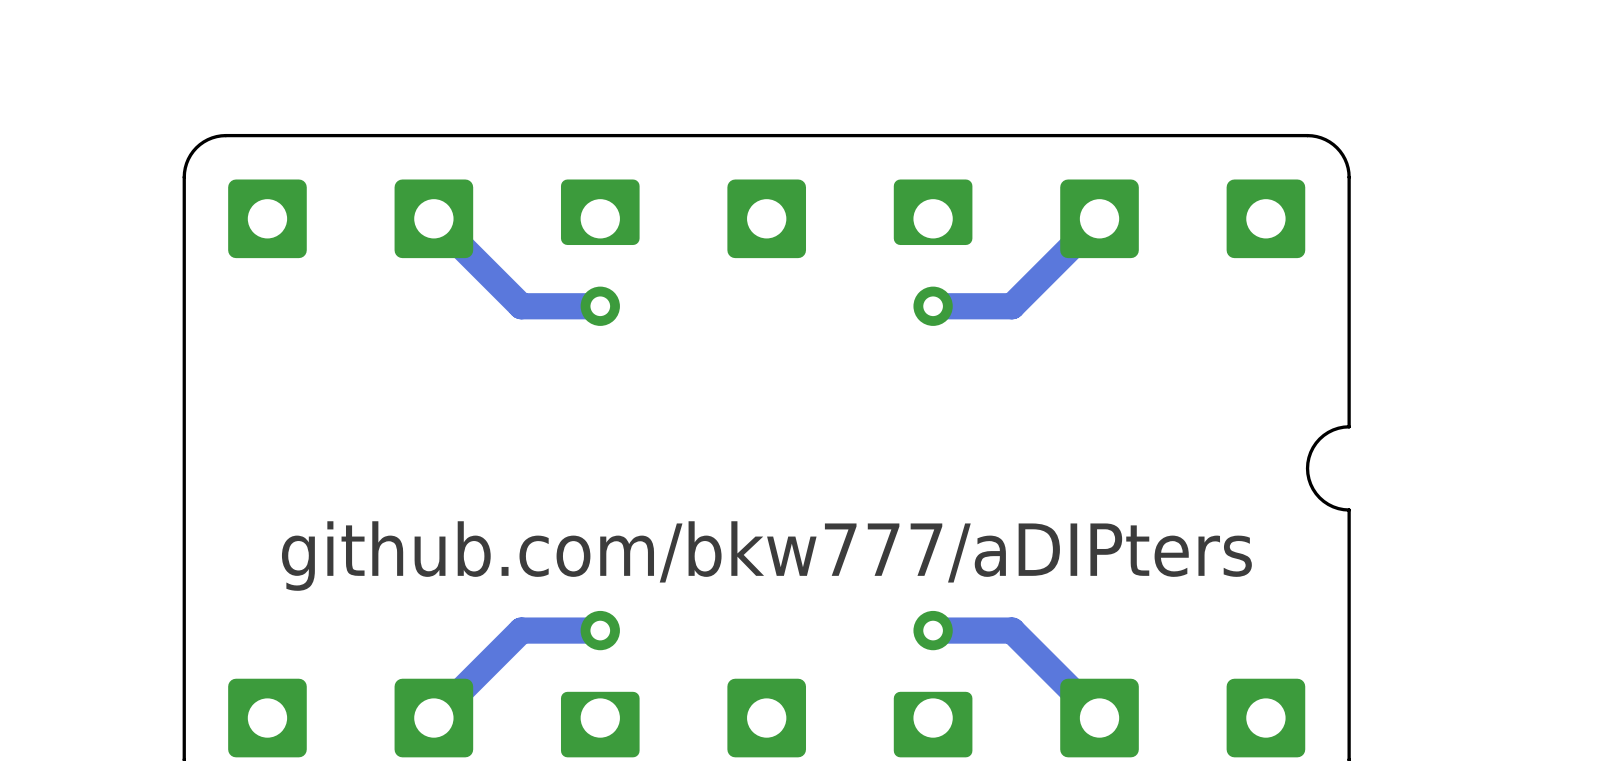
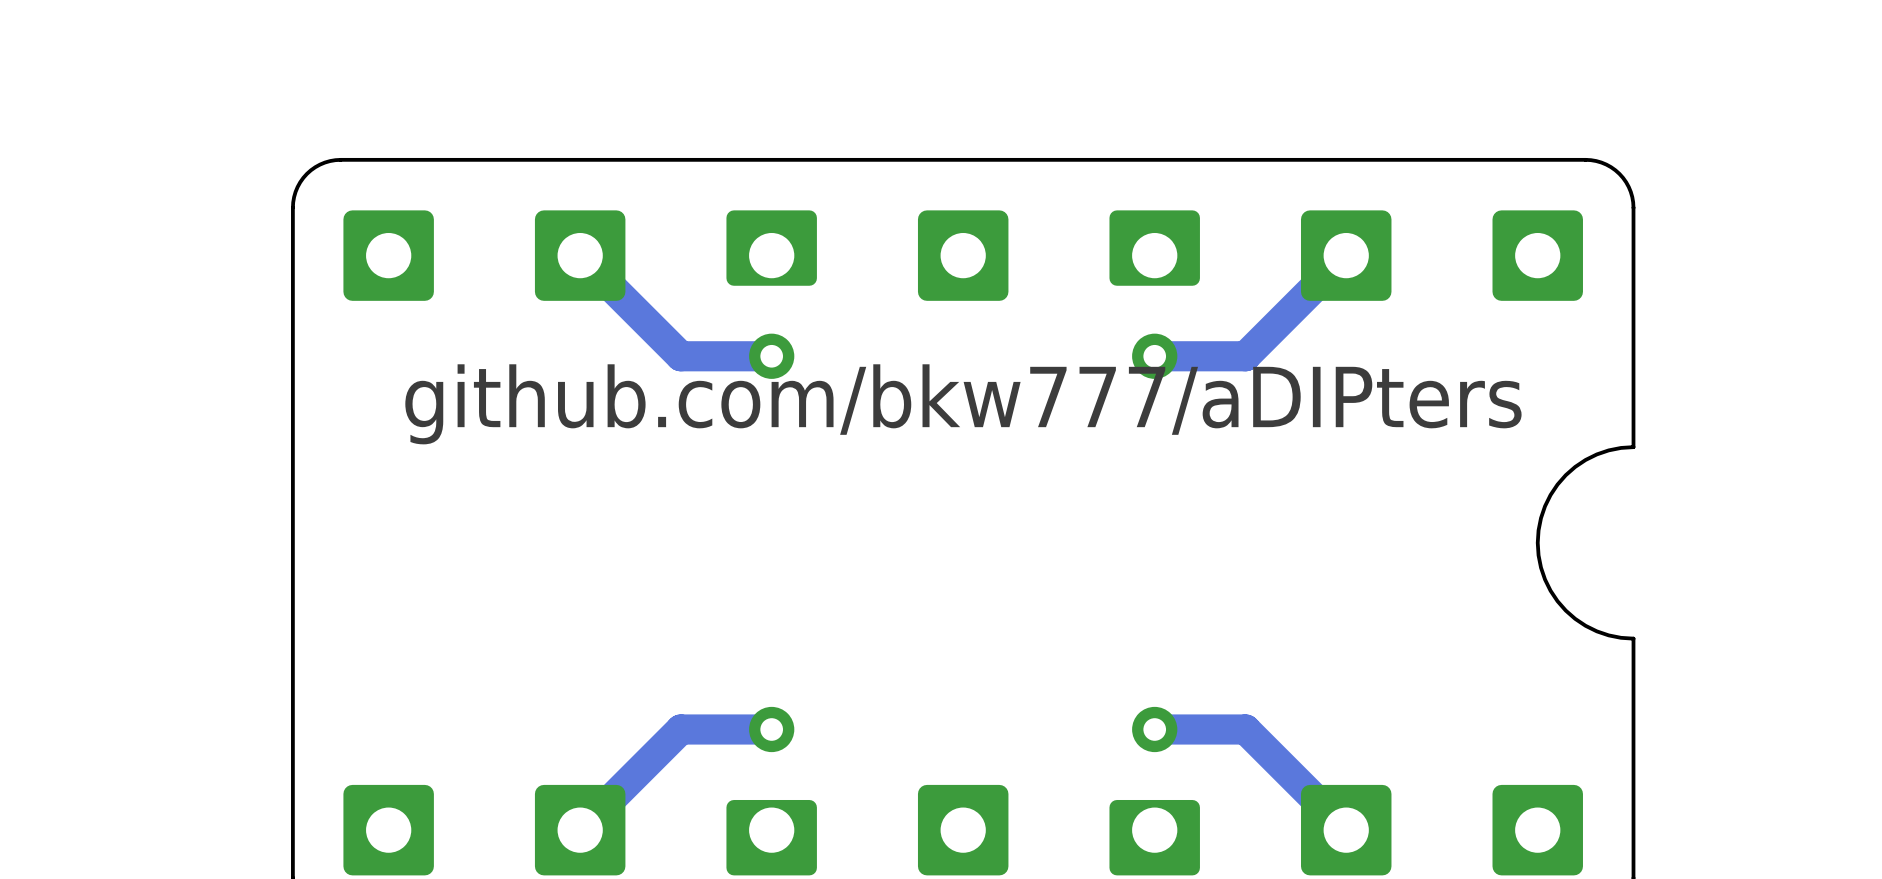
board edge: (1349, 385) (1349, 426) (1333, 429) (1319, 439) (1310, 452) (1307, 468) (1310, 484) (1319, 497) (1333, 506) (1349, 510) (1349, 551) -> (1633, 447) (1608, 450) (1596, 454) (1575, 466) (1565, 475) (1557, 484) (1545, 506) (1541, 518) (1537, 542) (1541, 567) (1545, 579) (1557, 601) (1565, 610) (1575, 618) (1596, 631) (1608, 635) (1633, 638)
text position: github.com/bkw777/aDIPters (766, 556) -> github.com/bkw777/aDIPters (963, 404)

